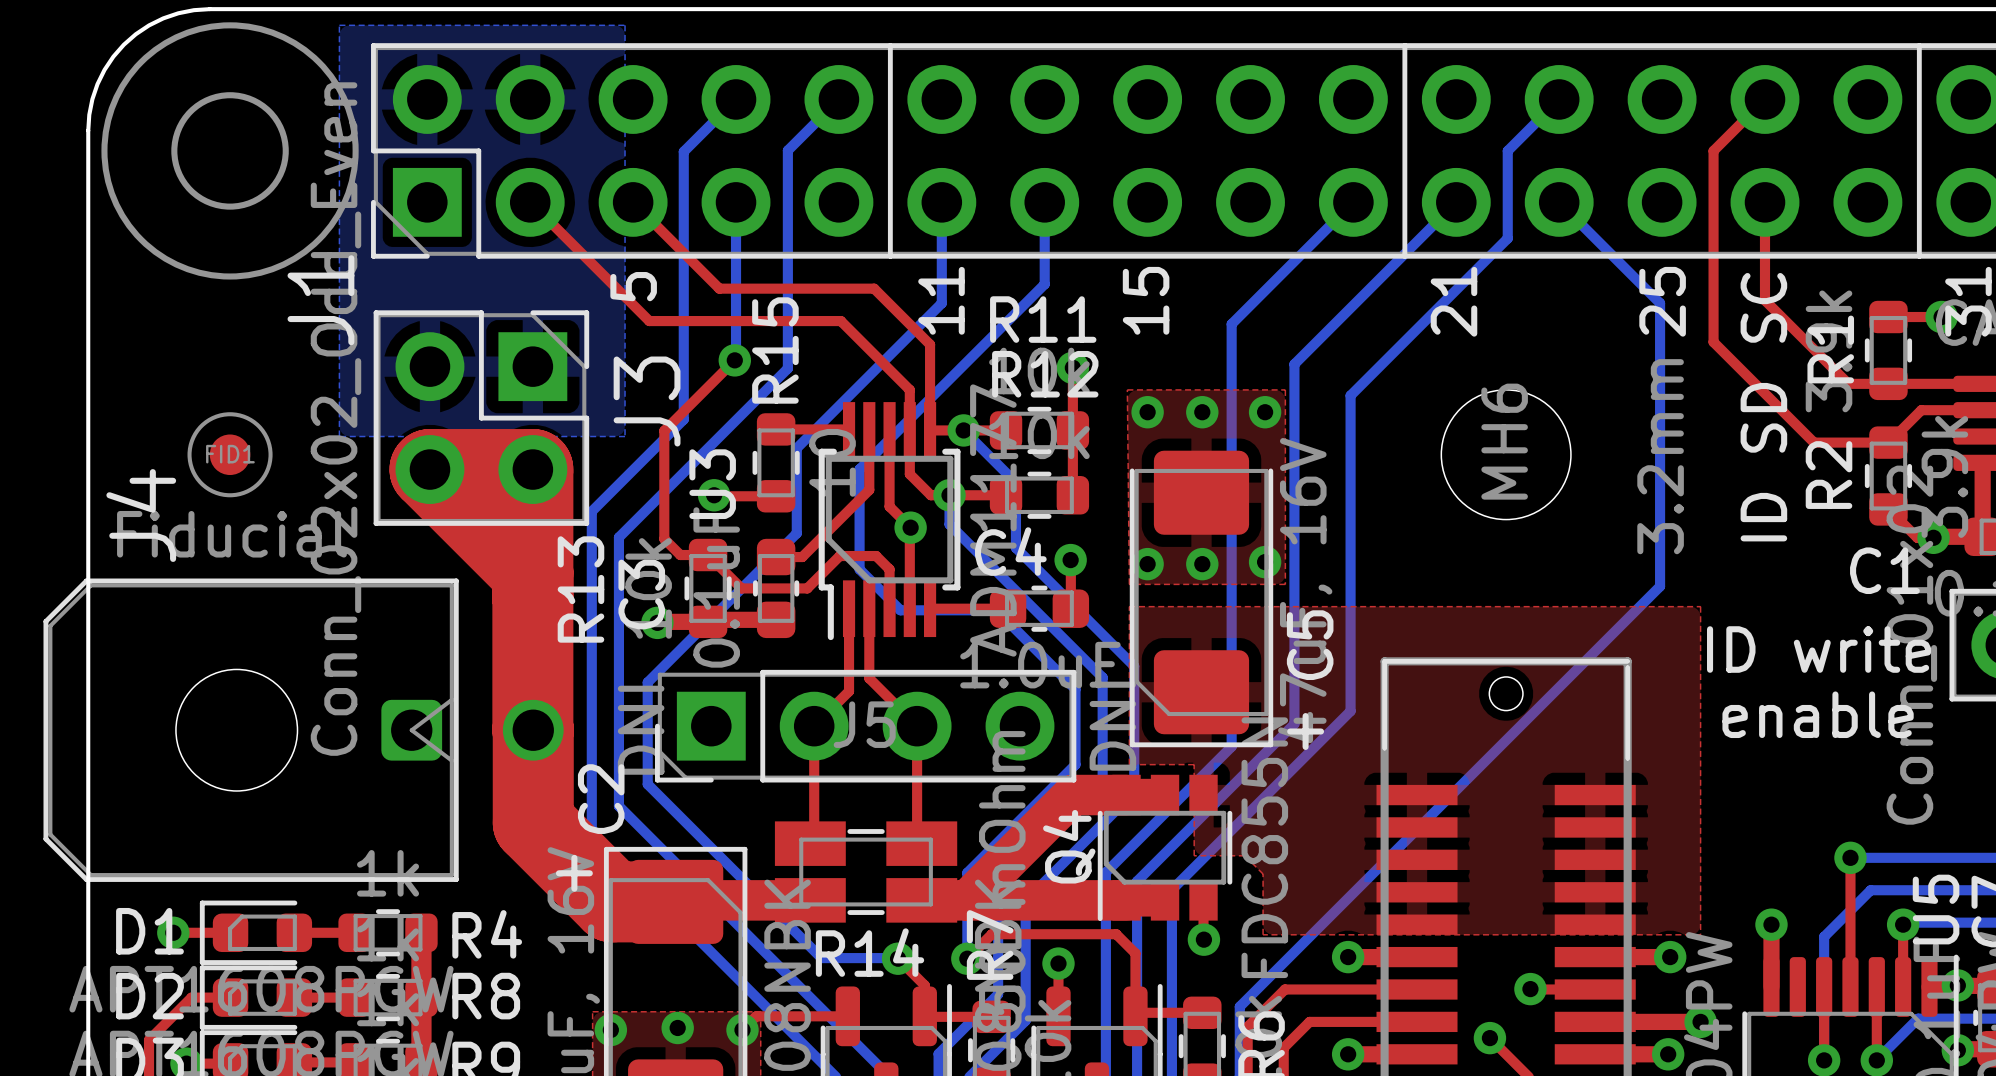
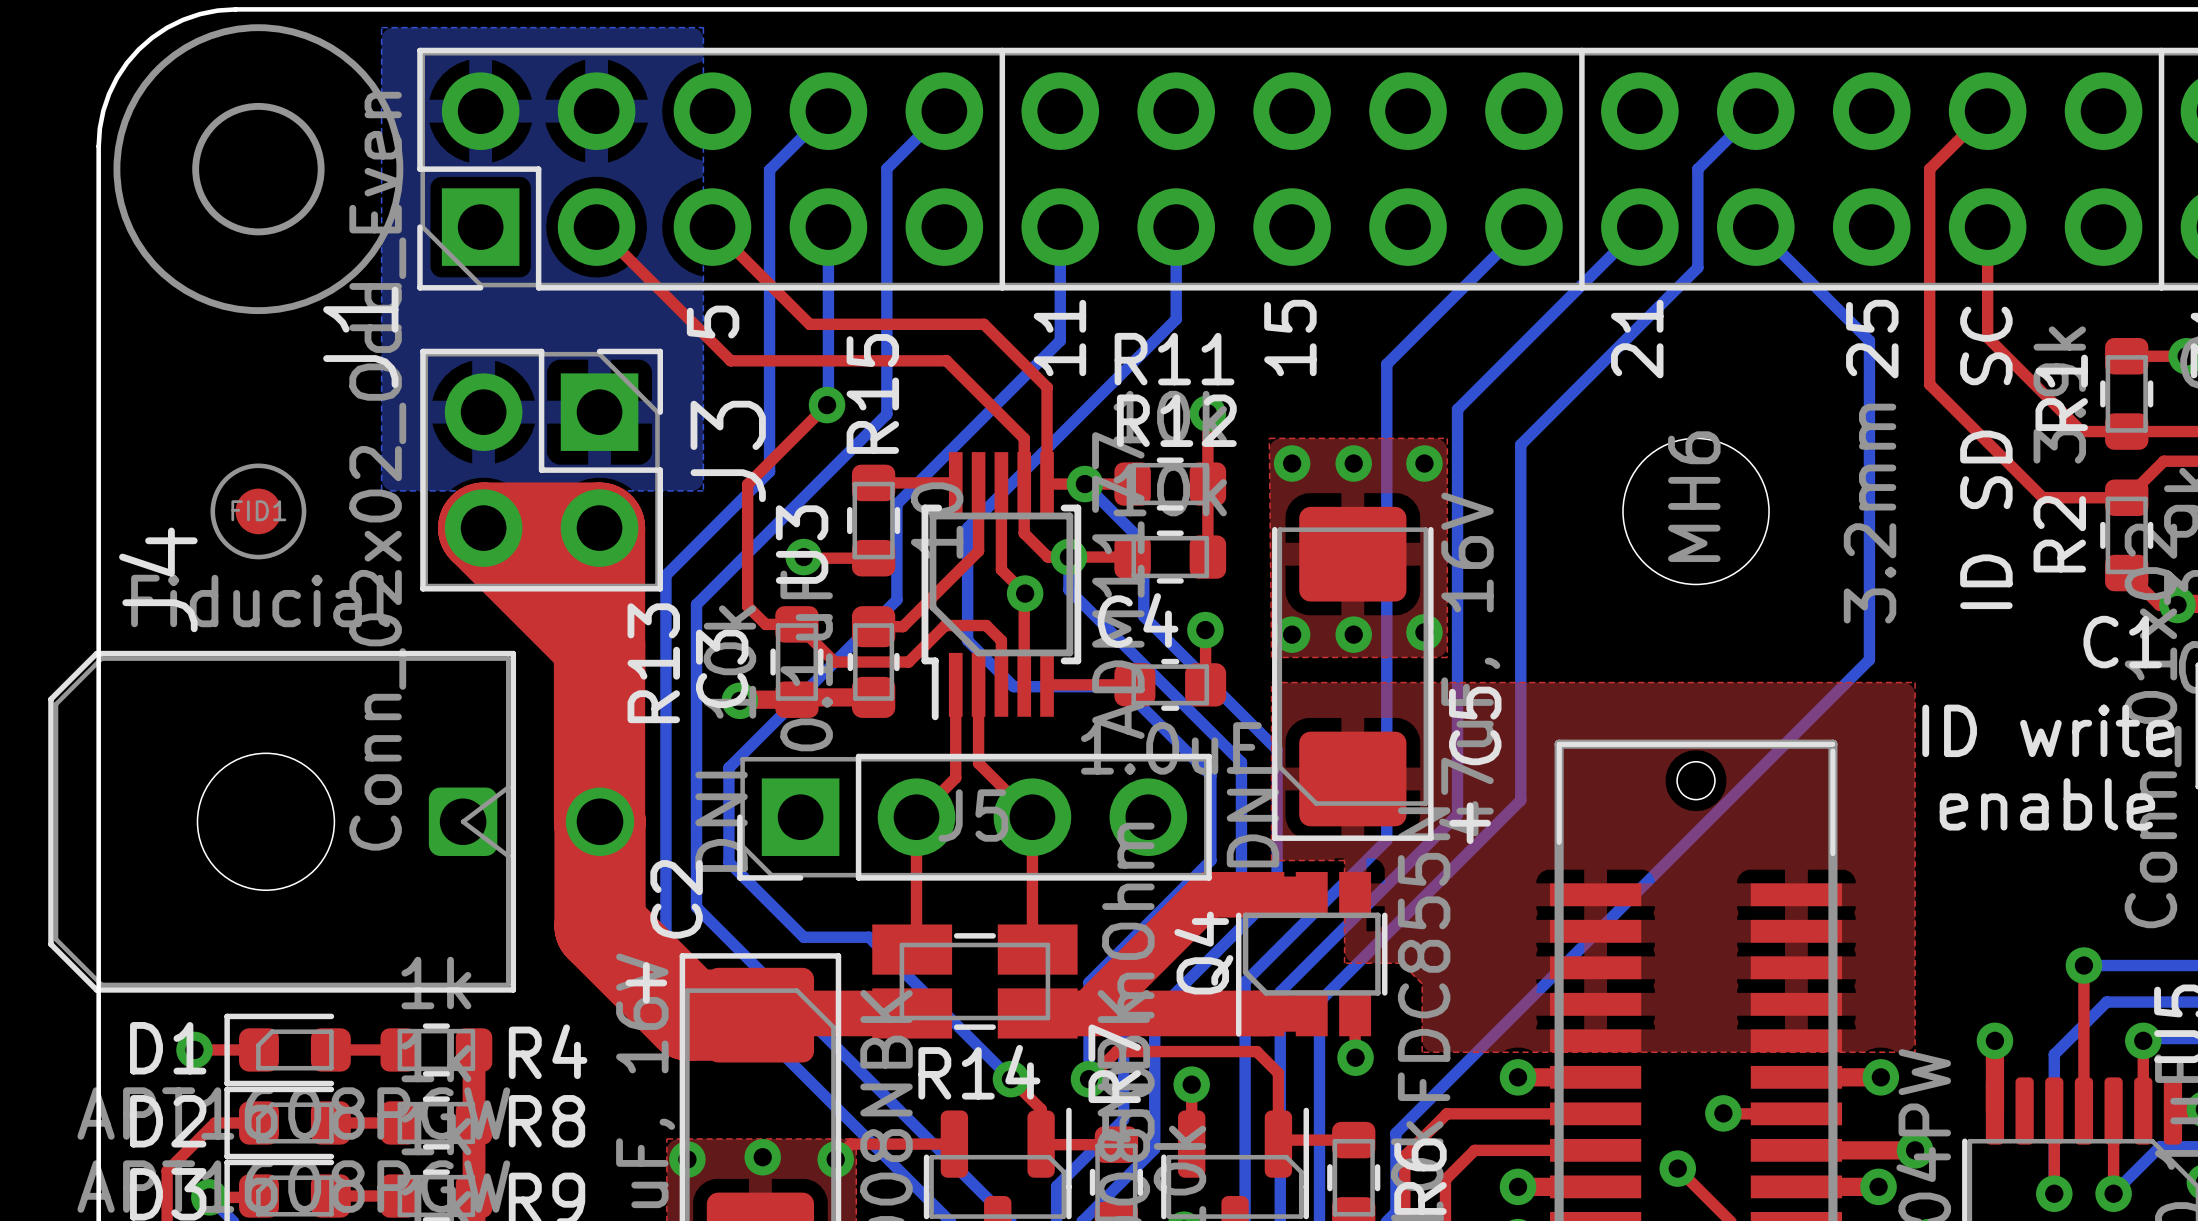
bottom track: (647, 766) (647, 784) (821, 958) (897, 958) -> (728, 862) (803, 937) (869, 937) (1010, 1078)

